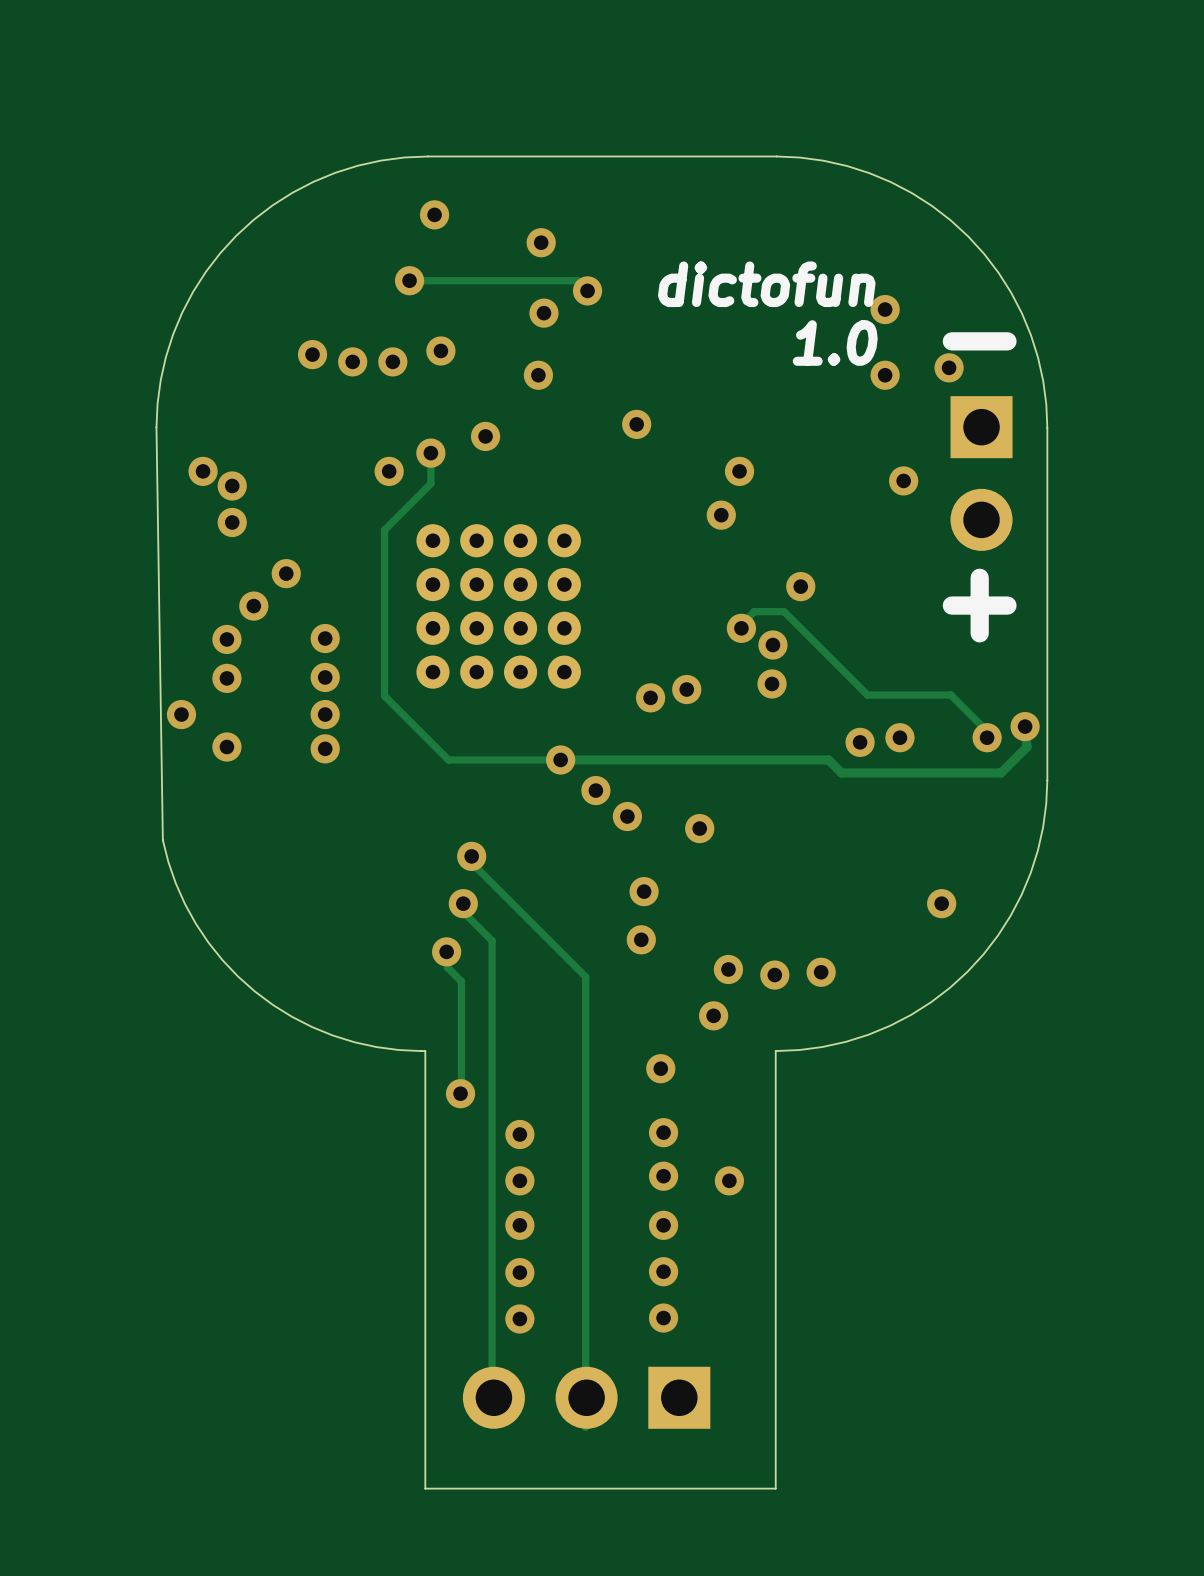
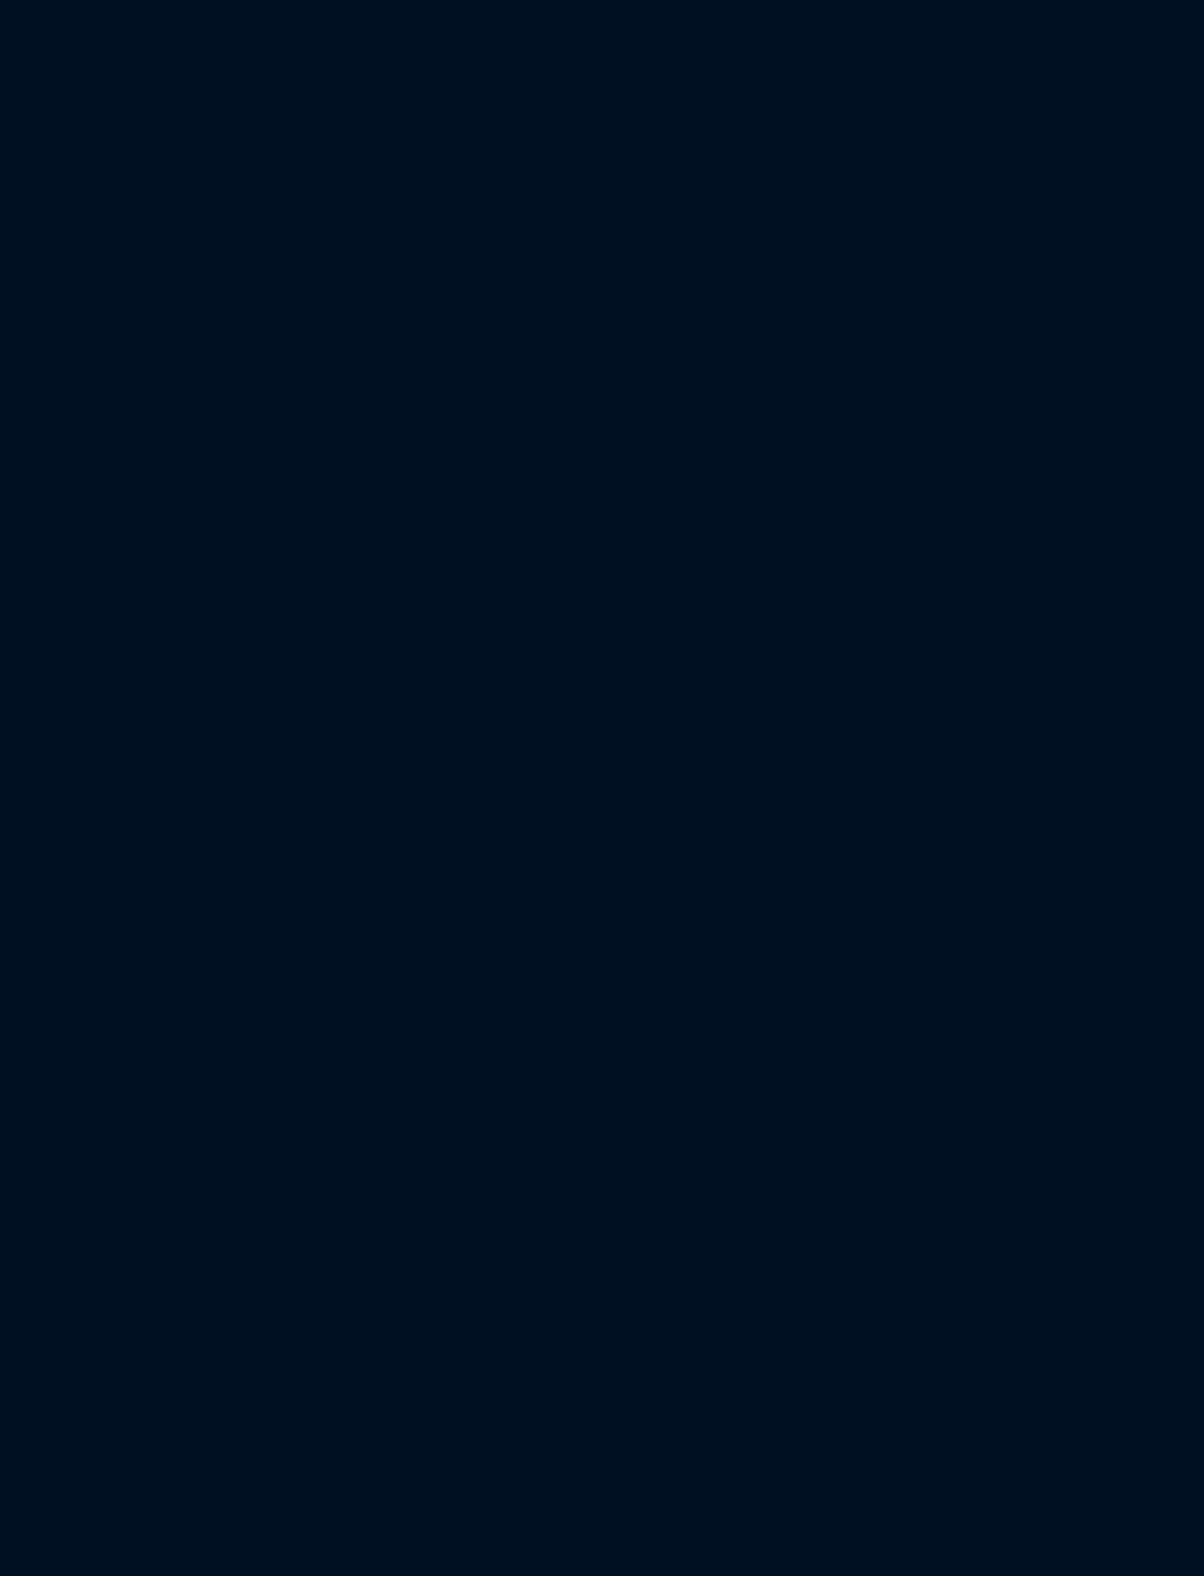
board edge: (776, 156) (428, 156) (381, 160) (335, 172) (313, 181) (272, 205) (236, 235) (220, 253) (193, 291) (173, 334) (165, 357) (157, 403) (156, 427) (162, 840) (175, 883) (195, 923) (222, 960) (254, 991) (292, 1016) (332, 1035) (376, 1047) (425, 1051) (425, 1488) (775, 1488) (775, 1051) (799, 1050) (845, 1041) (890, 1025) (931, 1002) (967, 971) (997, 935) (1021, 894) (1037, 850) (1046, 803) (1047, 780) (1047, 428) (1043, 381) (1031, 335) (1011, 292) (998, 272) (968, 236) (931, 205) (912, 193) (869, 173) (823, 160) (776, 156) -> none
via: (434, 214) -> none
via: (541, 242) -> none
track: (409, 280) (577, 280) (587, 290) -> none
via: (409, 280) -> none
text: dictofun (766, 284) -> none
via: (587, 290) -> none
via: (885, 309) -> none
via: (543, 313) -> none
text: - (979, 341) -> none
text: 1.0 (835, 343) -> none
via: (440, 350) -> none
via: (312, 354) -> none
via: (352, 361) -> none
via: (392, 361) -> none
via: (949, 367) -> none
via: (538, 375) -> none
via: (885, 375) -> none
via: (636, 424) -> none
via: (485, 436) -> none
track: (430, 453) (430, 483) (384, 530) (384, 696) (448, 759) (828, 759) (841, 772) (1001, 772) (1026, 746) (1025, 726) (1026, 724) -> none
via: (430, 453) -> none
via: (203, 471) -> none
via: (389, 471) -> none
via: (739, 471) -> none
part: (981, 473) -> none
via: (903, 480) -> none
via: (232, 485) -> none
via: (721, 515) -> none
via: (232, 522) -> none
via: (286, 573) -> none
via: (800, 586) -> none
text: + (979, 605) -> none
via: (253, 606) -> none
part: (498, 606) -> none
track: (741, 628) (741, 624) (754, 611) (784, 611) (867, 695) (950, 695) (987, 731) (987, 737) (998, 737) -> none
via: (741, 628) -> none
via: (325, 638) -> none
via: (226, 639) -> none
via: (772, 645) -> none
via: (325, 677) -> none
via: (226, 678) -> none
via: (772, 683) -> none
via: (686, 689) -> none
via: (650, 697) -> none
via: (181, 714) -> none
via: (325, 714) -> none
via: (1025, 726) -> none
via: (899, 737) -> none
via: (987, 737) -> none
via: (860, 742) -> none
via: (226, 746) -> none
via: (325, 748) -> none
via: (560, 759) -> none
via: (595, 790) -> none
via: (627, 816) -> none
via: (699, 828) -> none
track: (471, 856) (471, 862) (585, 976) (585, 1427) -> none
via: (471, 856) -> none
via: (644, 891) -> none
track: (463, 903) (463, 912) (492, 940) (492, 1411) -> none
via: (463, 903) -> none
via: (941, 903) -> none
via: (641, 939) -> none
track: (446, 951) (447, 967) (461, 981) (460, 1093) -> none
via: (446, 951) -> none
via: (728, 969) -> none
via: (821, 972) -> none
via: (774, 975) -> none
via: (713, 1015) -> none
via: (660, 1068) -> none
via: (460, 1093) -> none
via: (663, 1132) -> none
via: (519, 1134) -> none
via: (663, 1176) -> none
via: (519, 1180) -> none
via: (729, 1180) -> none
via: (519, 1225) -> none
via: (663, 1225) -> none
via: (663, 1271) -> none
via: (519, 1272) -> none
via: (519, 1318) -> none
via: (663, 1318) -> none
part: (586, 1397) -> none

